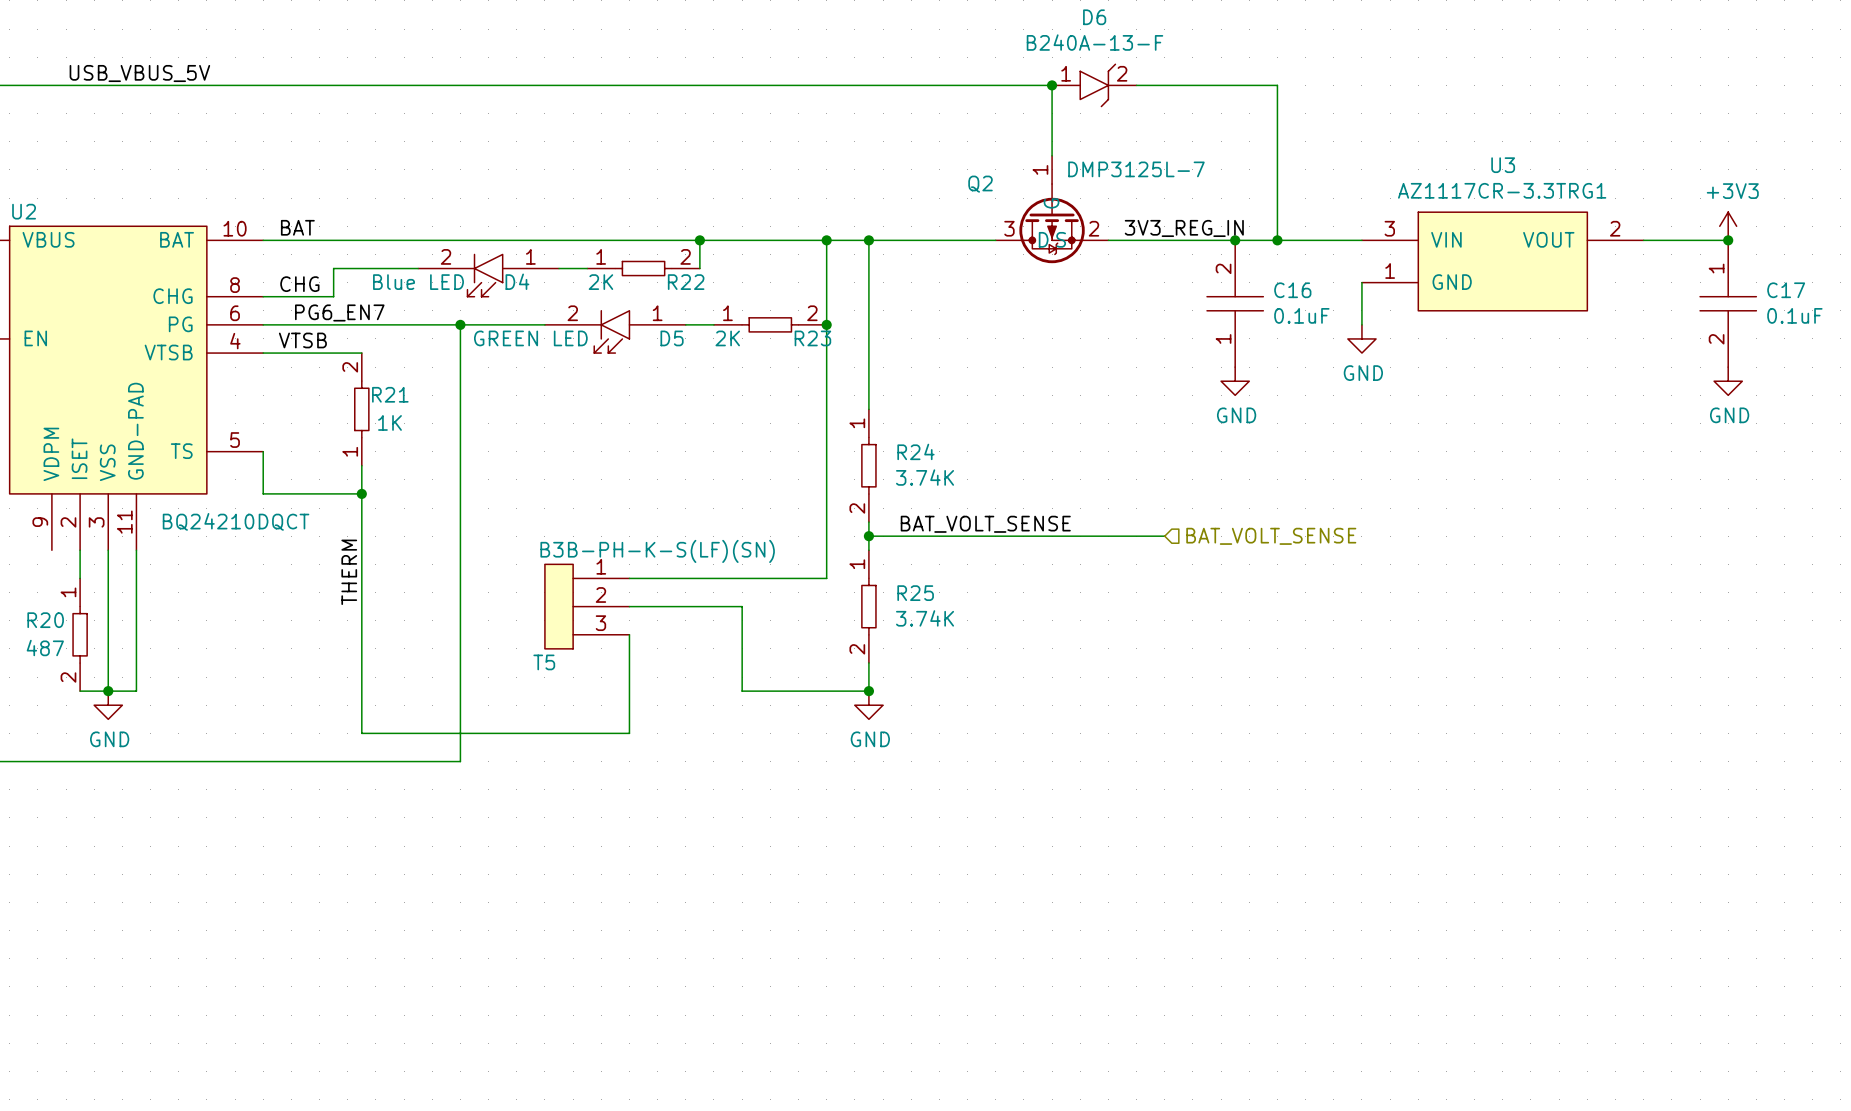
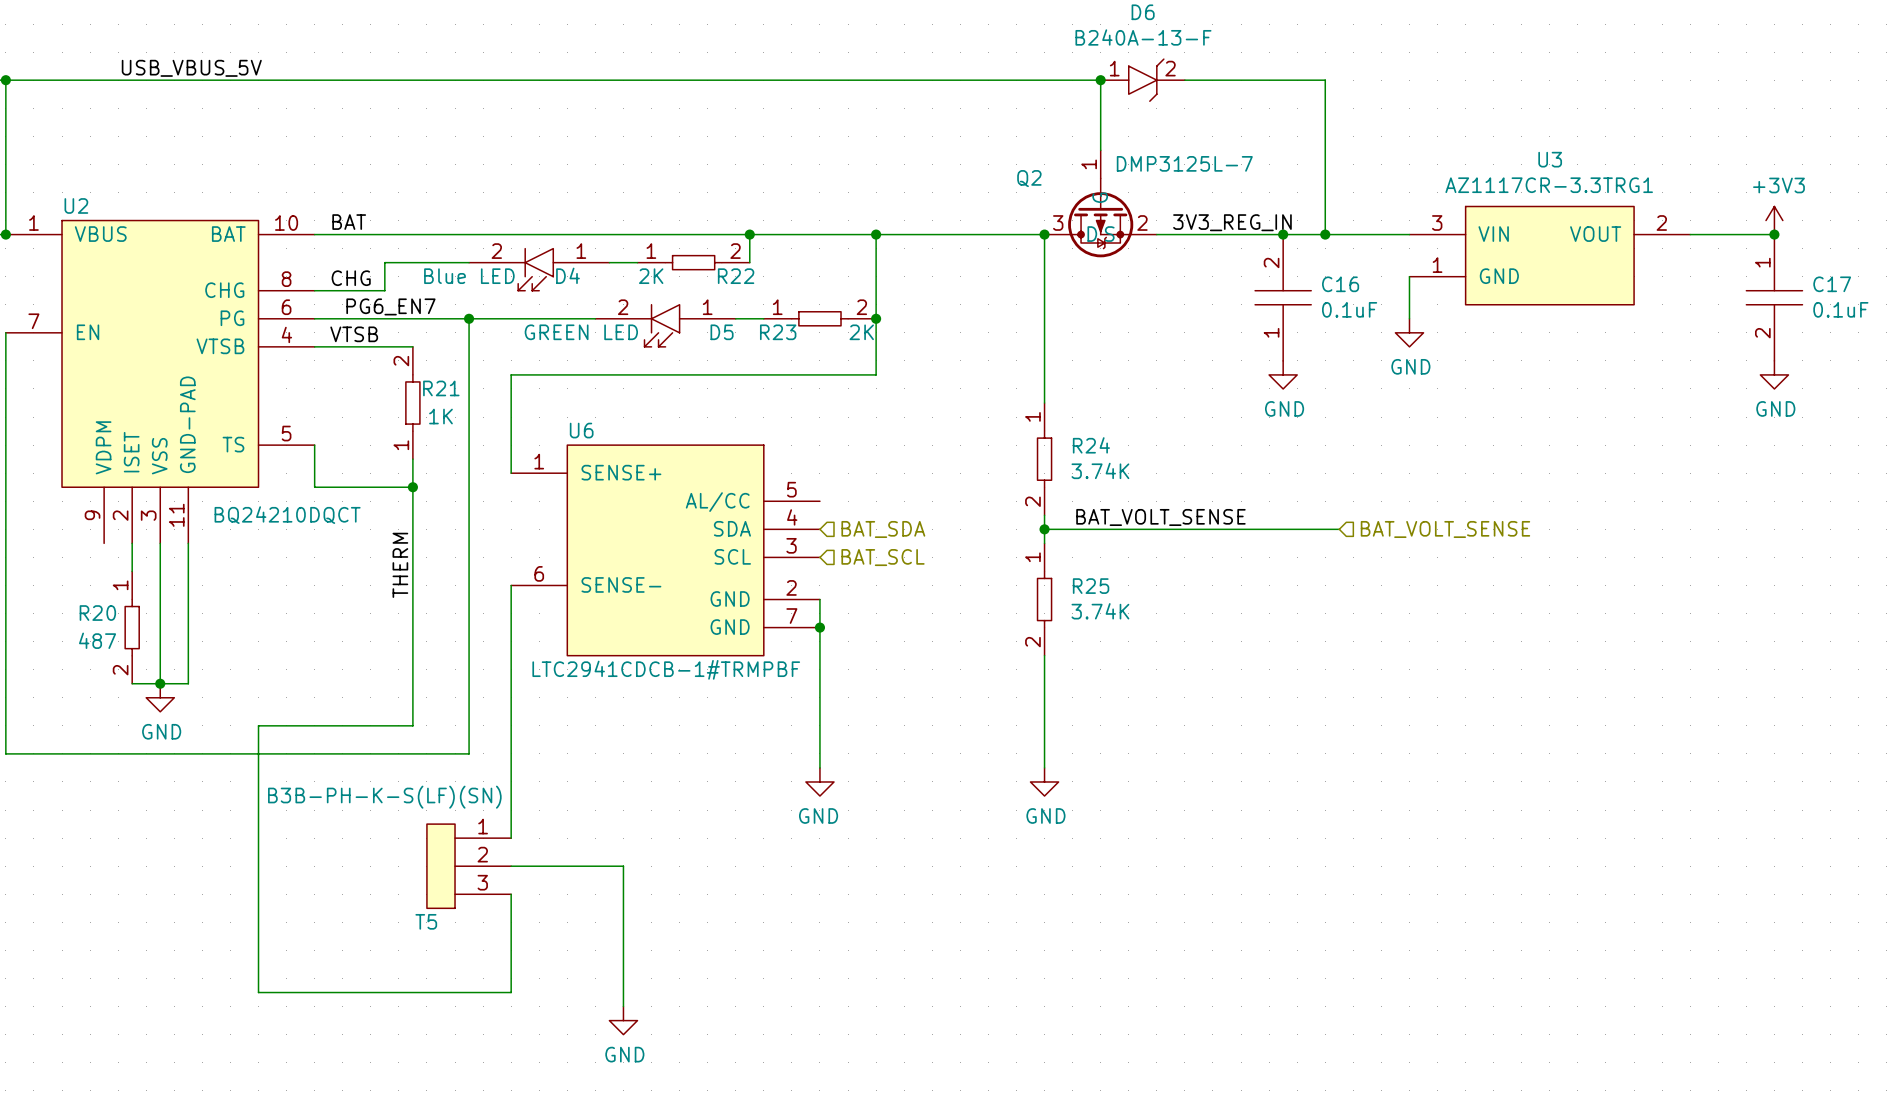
wire: (868, 240) (868, 409) -> (1044, 234) (1044, 403)
junction: (868, 240) -> none
junction: none -> (1044, 234)
wire: none -> (469, 318) (469, 753)
wire: (460, 324) (460, 381) -> none
junction position: (460, 324) -> (469, 318)
R23 text position: 2K (727, 338) -> 2K (861, 332)
R23 name position: R23 (812, 338) -> R23 (778, 332)
wire: (826, 381) (826, 578) (629, 578) -> (876, 374) (511, 374)
R24 position: (868, 465) -> (1044, 459)
wire: (460, 479) (460, 592) -> none
wire: (868, 522) (868, 550) -> (1044, 515) (1044, 543)
label position: BAT_VOLT_SENSE (985, 524) -> BAT_VOLT_SENSE (1160, 517)
hierarchical label: none -> BAT_SDA (883, 529)
wire: (868, 536) (995, 536) -> none
junction: (868, 536) -> none
junction: none -> (1044, 529)
wire: none -> (1212, 529) (1339, 529)
hierarchical label position: BAT_VOLT_SENSE (1271, 536) -> BAT_VOLT_SENSE (1445, 529)
T5 value position: B3B-PH-K-S(LF)(SN) (657, 551) -> B3B-PH-K-S(LF)(SN) (384, 797)
U6: none -> (665, 550)
hierarchical label: none -> BAT_SCL (883, 557)
T5 position: (587, 606) -> (469, 866)
wire: (629, 606) (742, 606) (742, 691) (868, 691) (868, 662) -> none
wire: none -> (819, 599) (819, 767)
R25 position: (868, 606) -> (1044, 599)
wire: (629, 634) (629, 733) (361, 733) -> (511, 894) (511, 992) (258, 992) (258, 725) (412, 725)
junction: none -> (819, 627)
wire: none -> (1044, 655) (1044, 767)
junction: (868, 691) -> none
power symbol: GND (868, 705) -> none
wire: (418, 761) (460, 761) -> (511, 838) (511, 753)
power symbol: none -> GND (819, 781)
power symbol: none -> GND (1044, 781)
wire: none -> (511, 866) (623, 866) (623, 1006)
power symbol: none -> GND (623, 1020)

